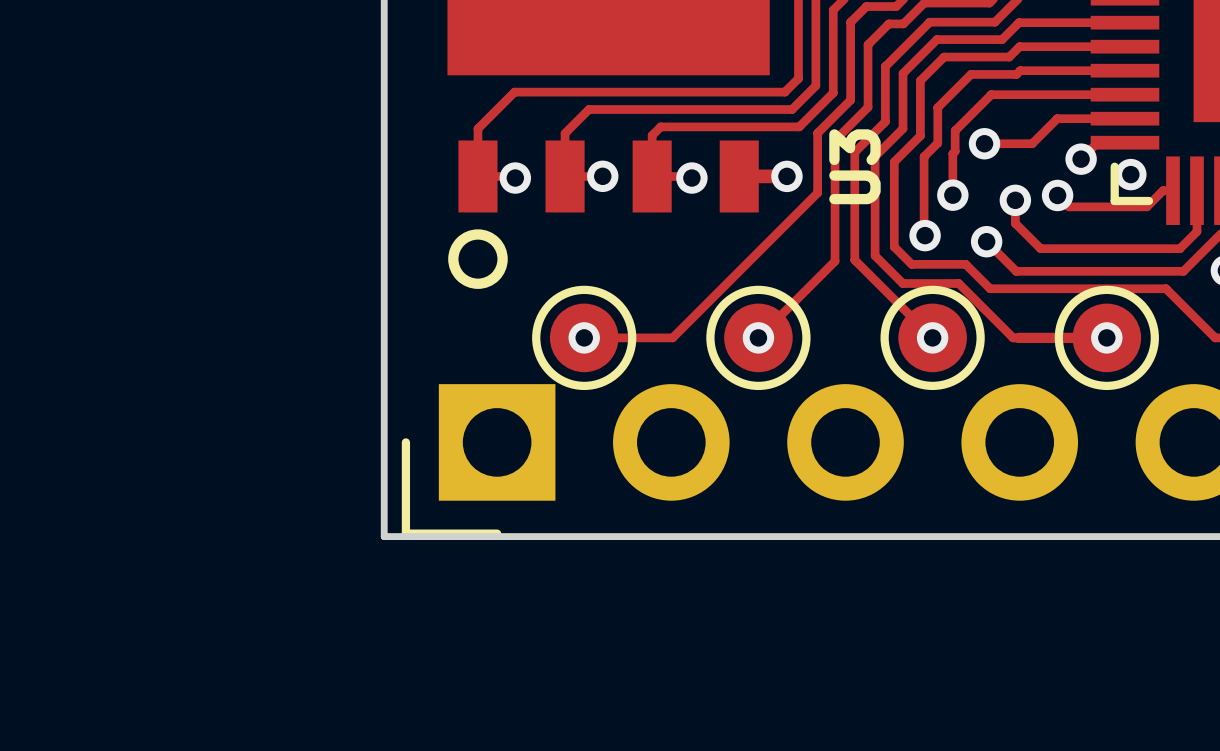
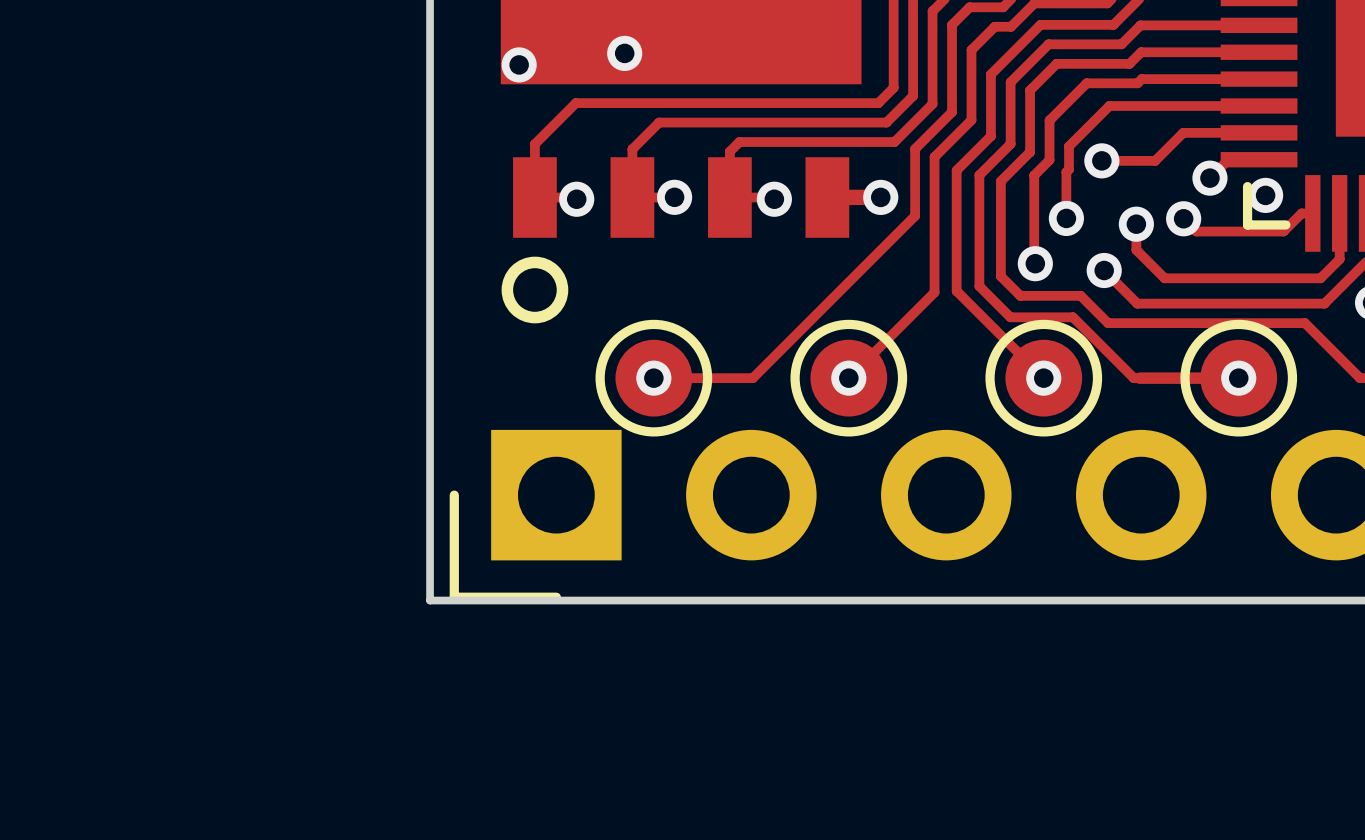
via: none -> (624, 53)
via: none -> (519, 64)
U3 name: U3 (854, 166) -> none

